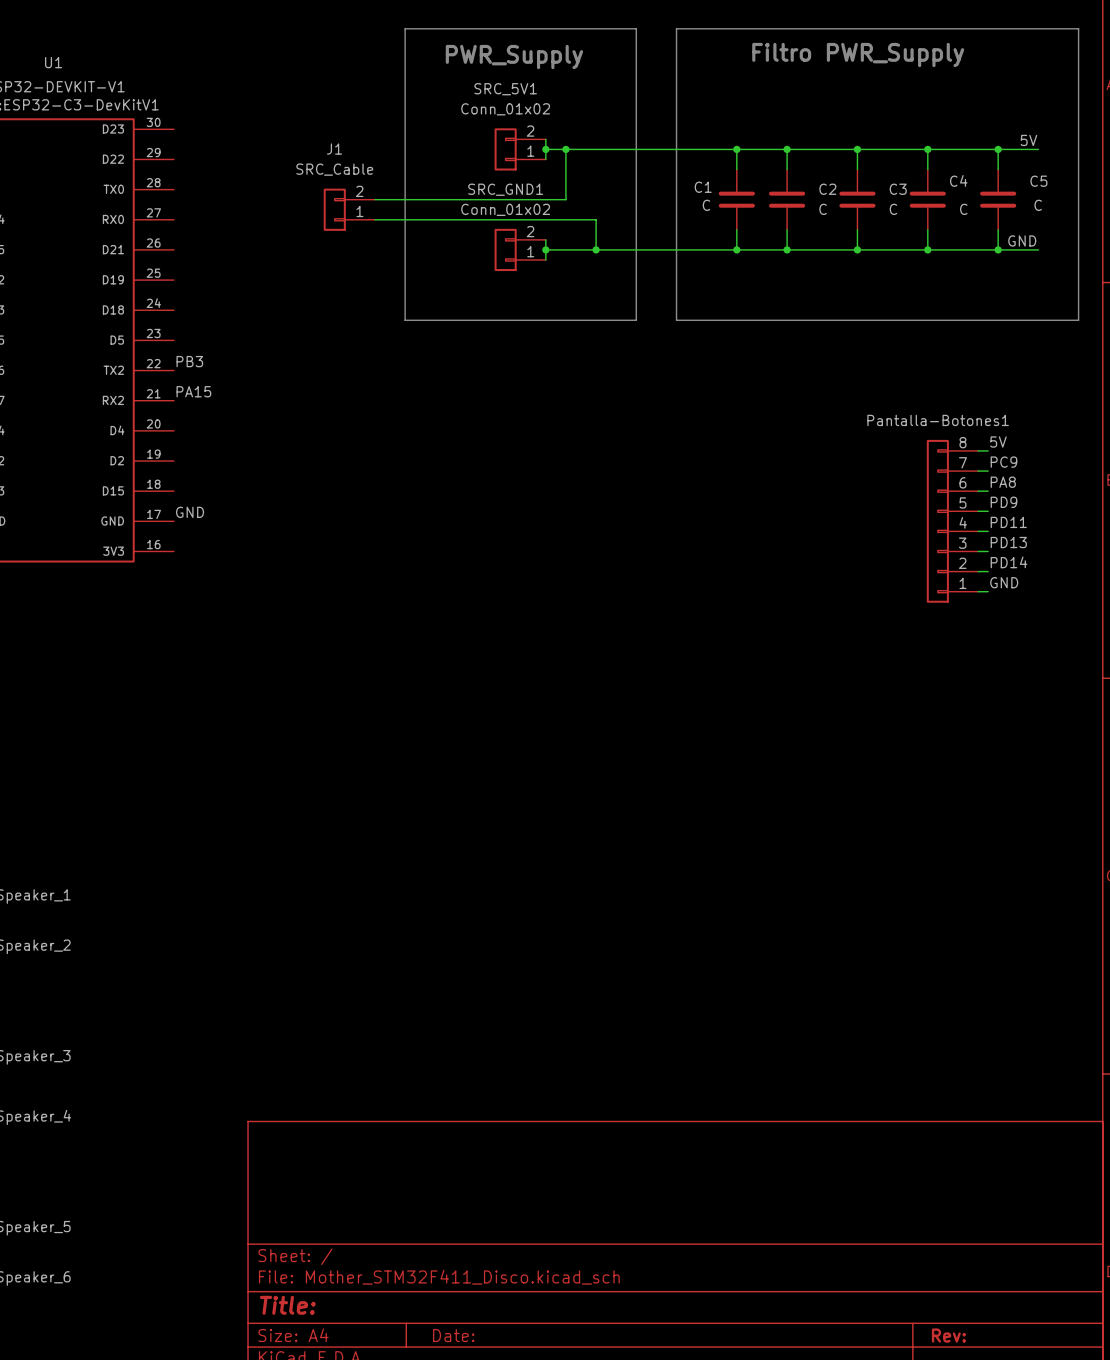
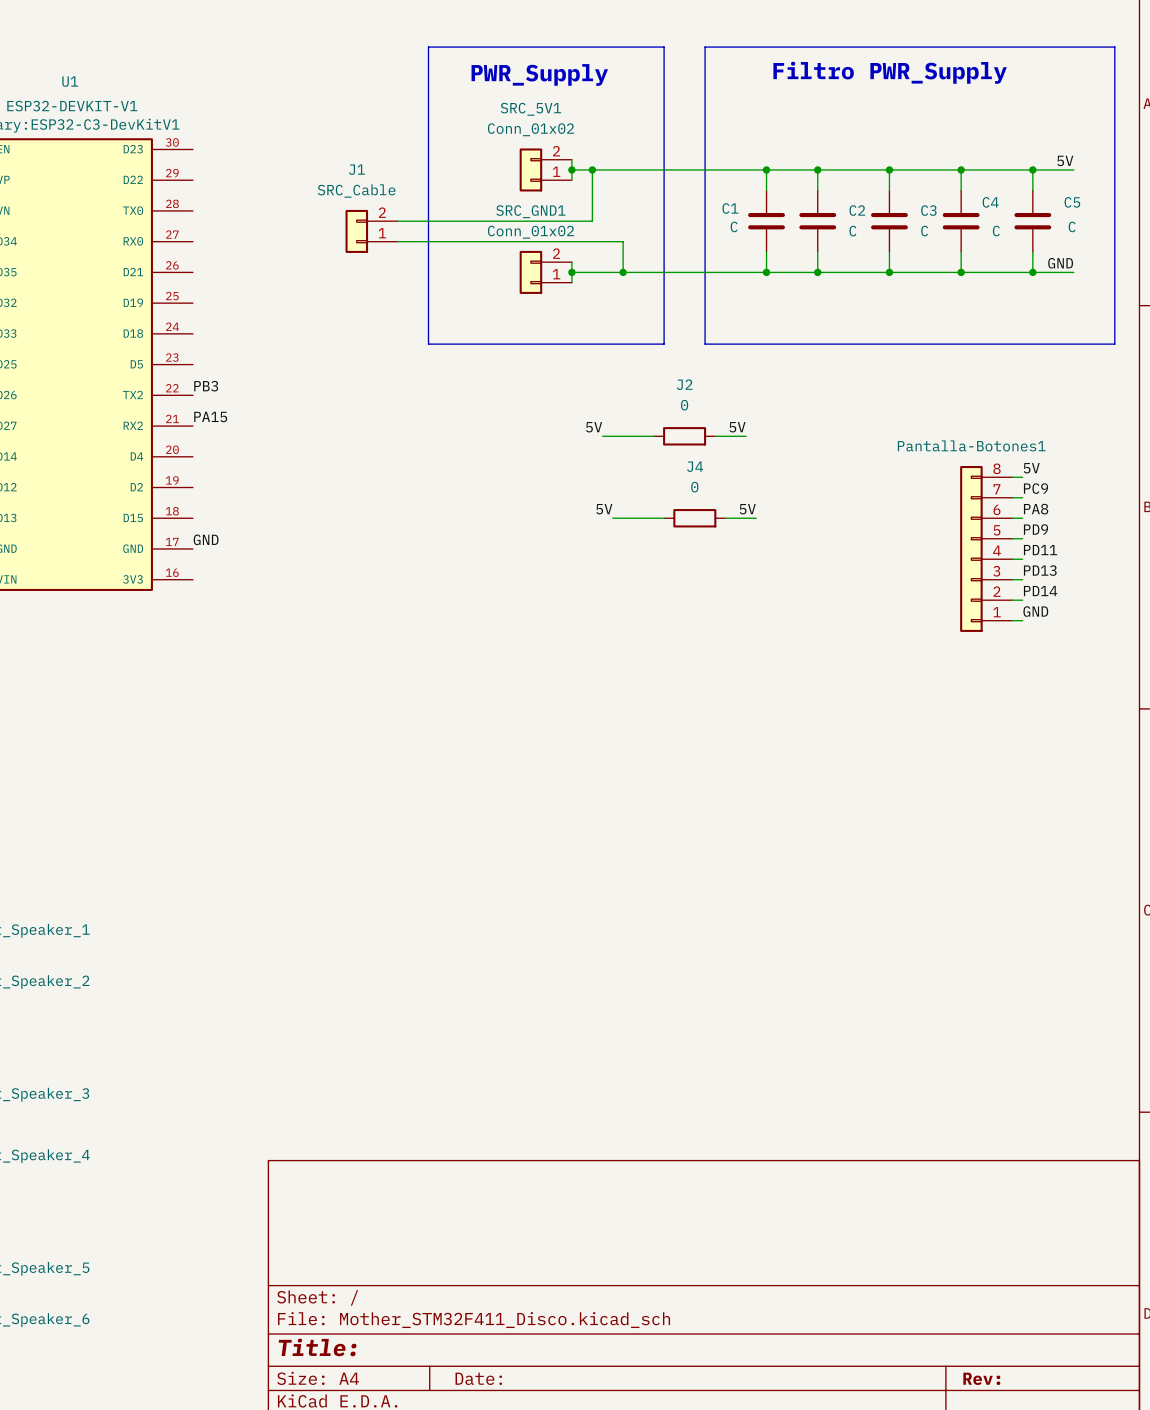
label: none -> 5V (594, 427)
label: none -> 5V (737, 427)
wire: none -> (602, 436) (653, 436)
J2: none -> 0 (684, 436)
wire: none -> (715, 436) (746, 436)
label: none -> 5V (604, 509)
label: none -> 5V (747, 509)
wire: none -> (612, 518) (664, 518)
J4: none -> 0 (694, 518)
wire: none -> (725, 518) (756, 518)

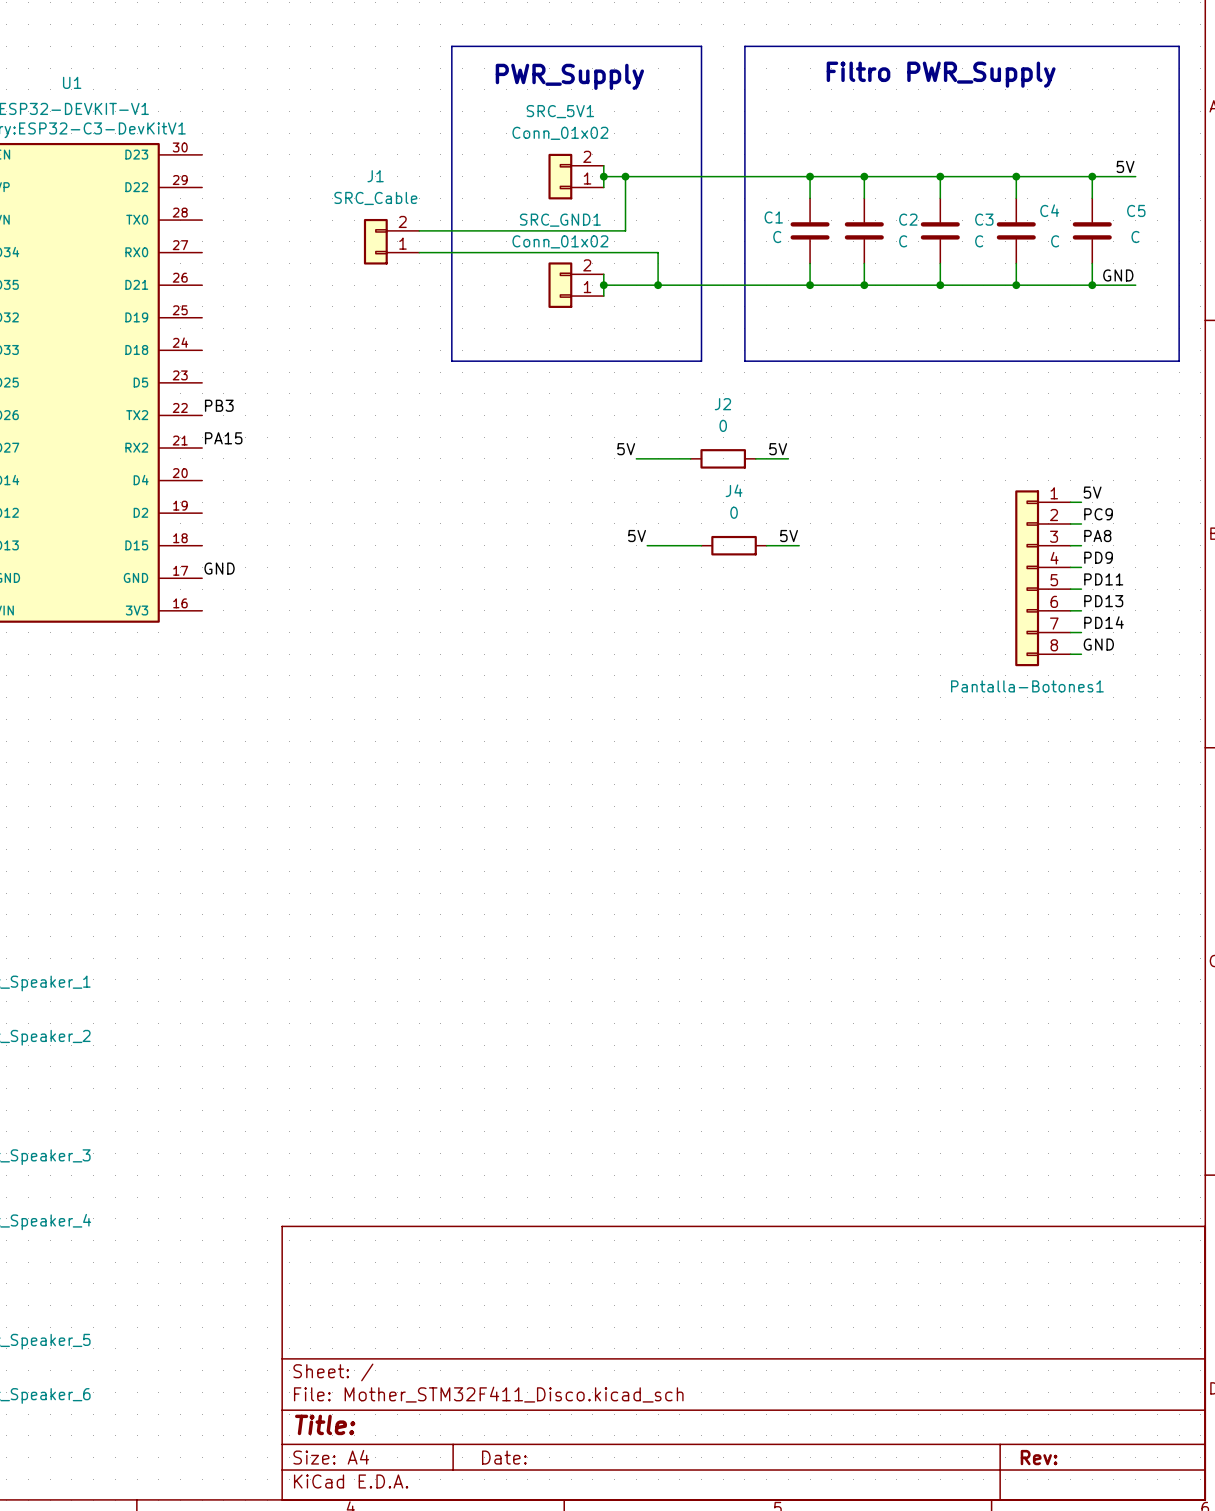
Pantalla-Botones1 flip: as is (971, 548) -> up-down (1027, 578)

